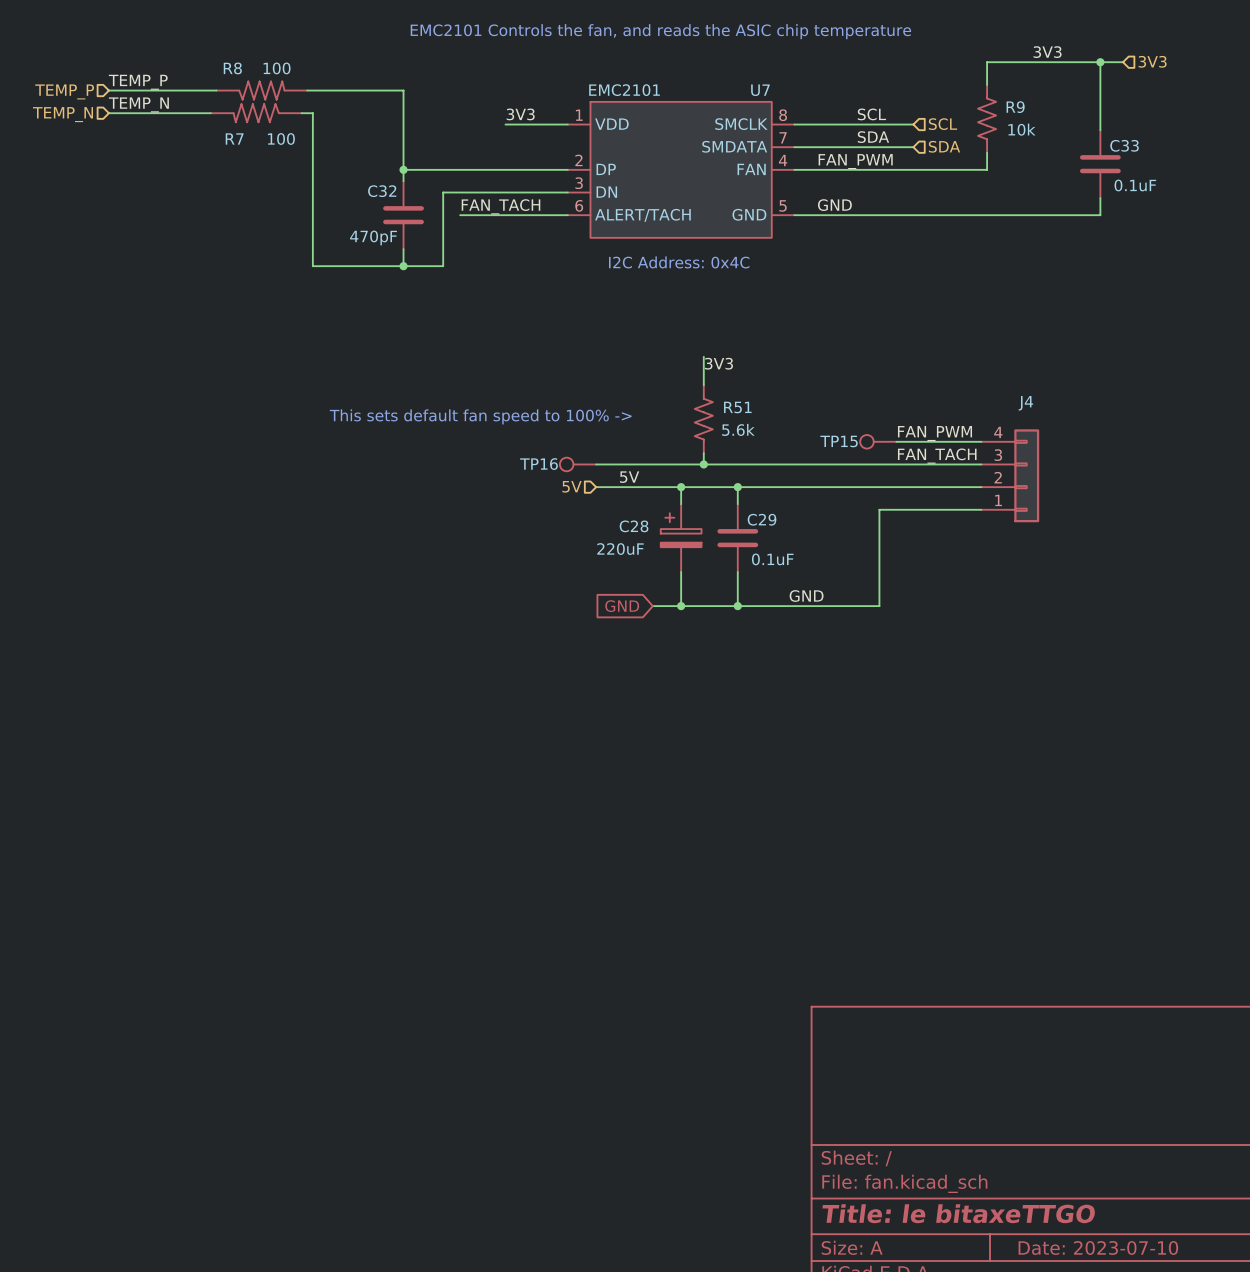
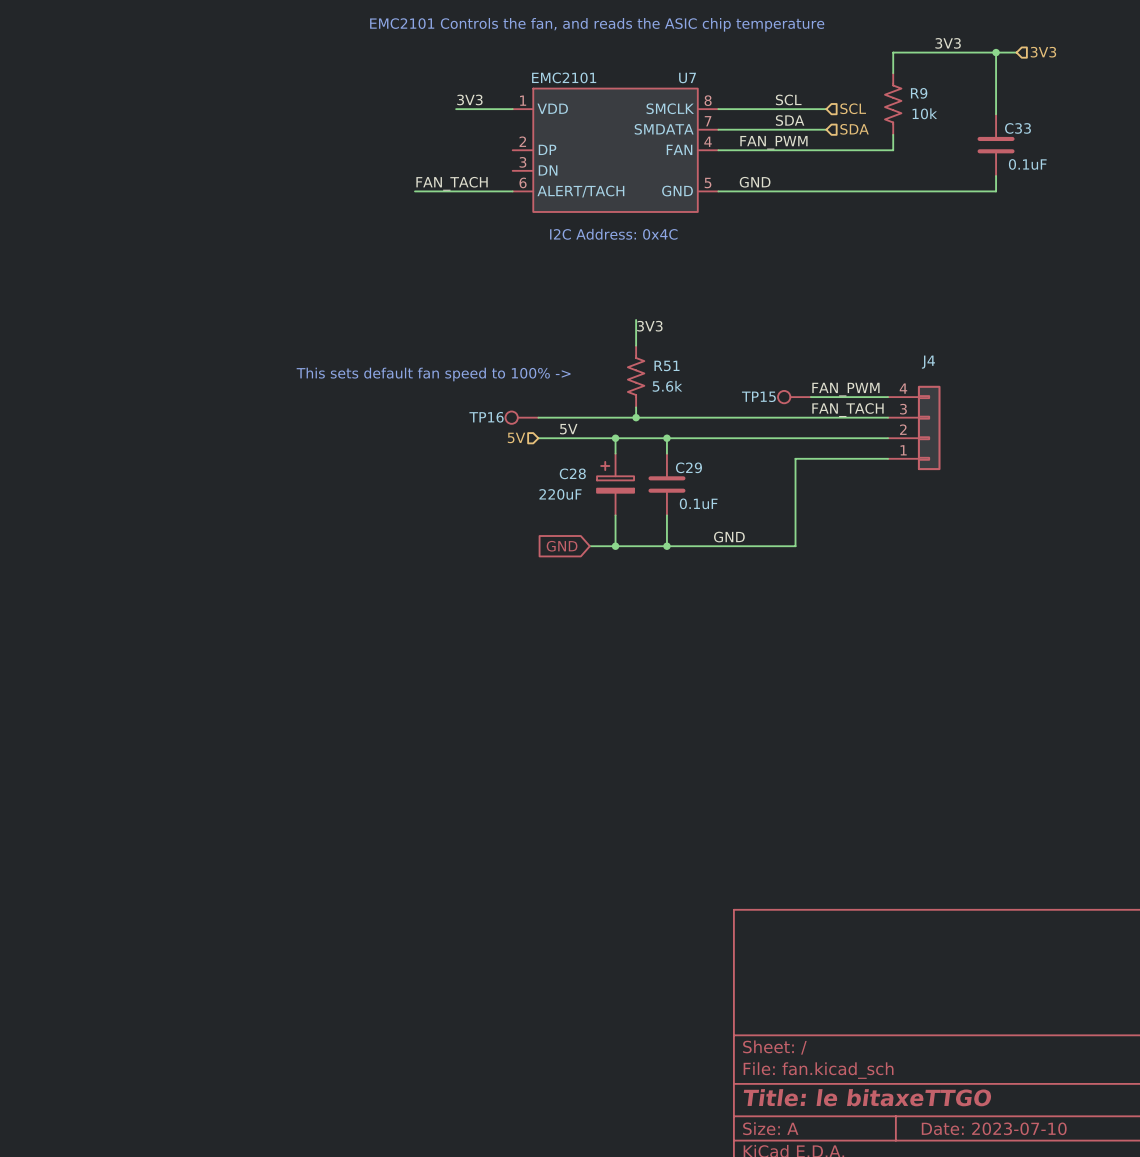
label: TEMP_P (138, 82) -> none
wire: (108, 90) (216, 90) -> none
R8: 100 (261, 90) -> none
wire: (307, 90) (403, 90) (403, 181) -> none
hierarchical label: TEMP_P (64, 91) -> none
label: TEMP_N (138, 104) -> none
wire: (108, 113) (210, 113) -> none
R7: 100 (256, 113) -> none
wire: (301, 113) (312, 113) (312, 266) (443, 266) (443, 192) (567, 192) -> none
hierarchical label: TEMP_N (63, 114) -> none
wire: (403, 169) (567, 169) -> none
junction: (403, 169) -> none
C32: 470pF (403, 215) -> none
wire: (403, 249) (403, 266) -> none
junction: (403, 266) -> none

